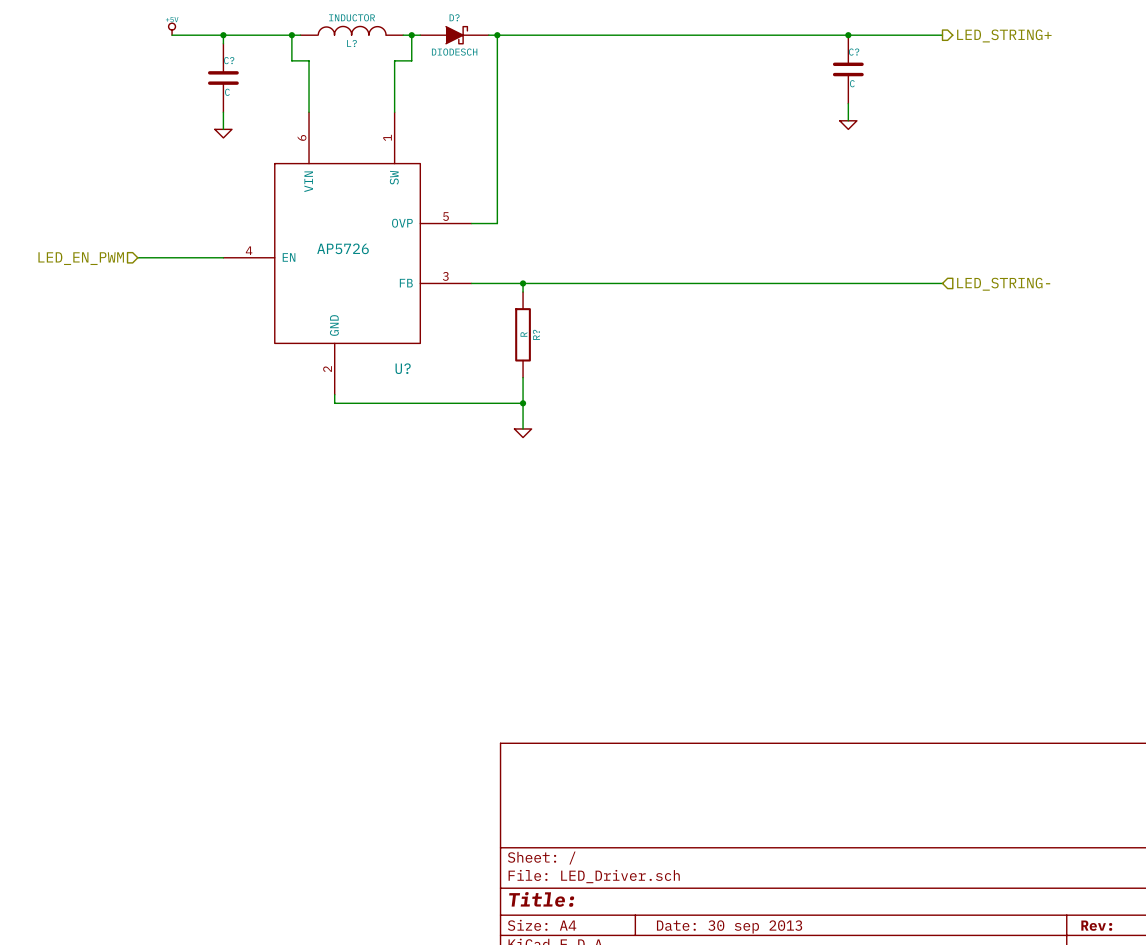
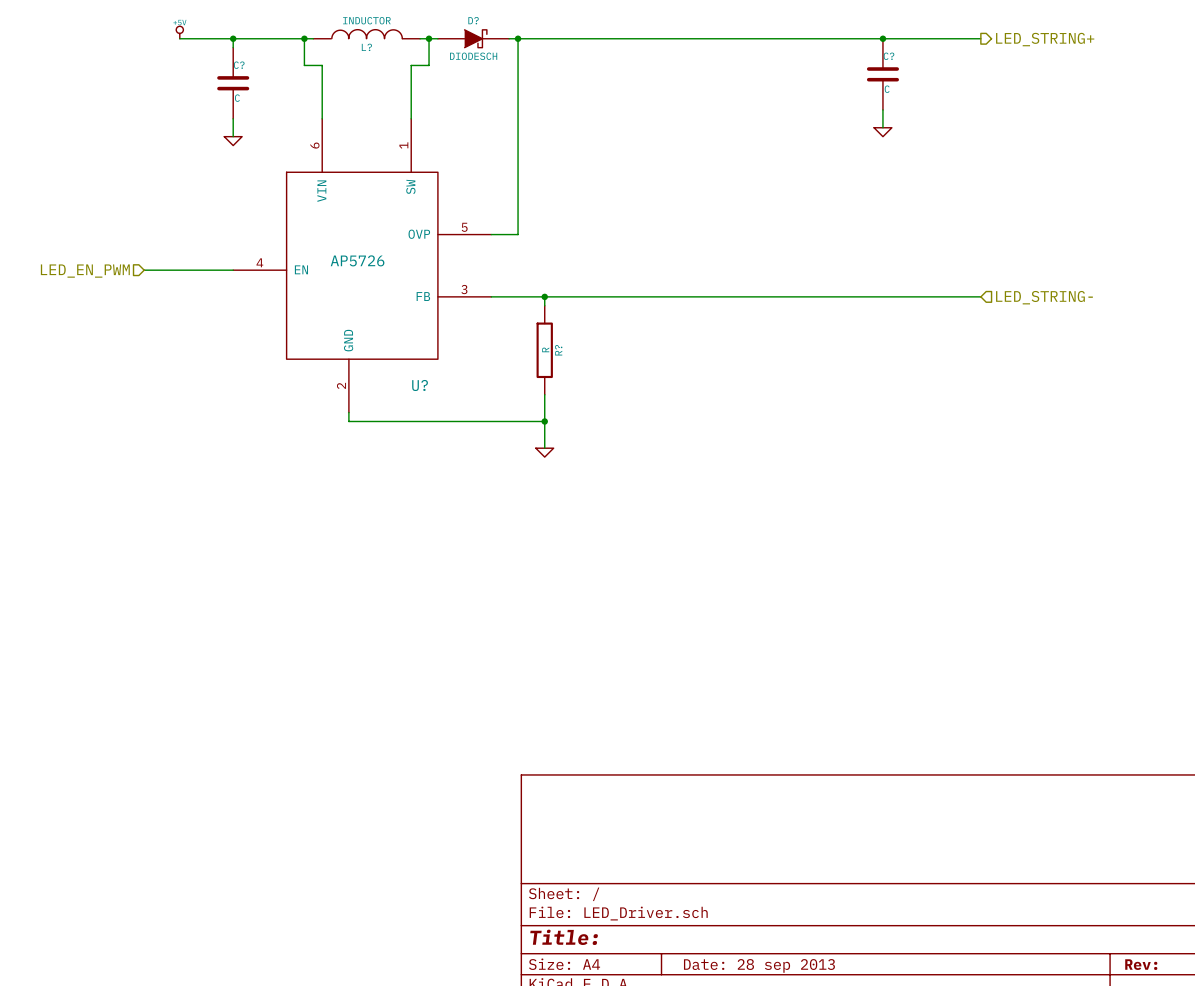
title block: Date: 30 sep 2013 (729, 926) -> Date: 28 sep 2013 (759, 965)

